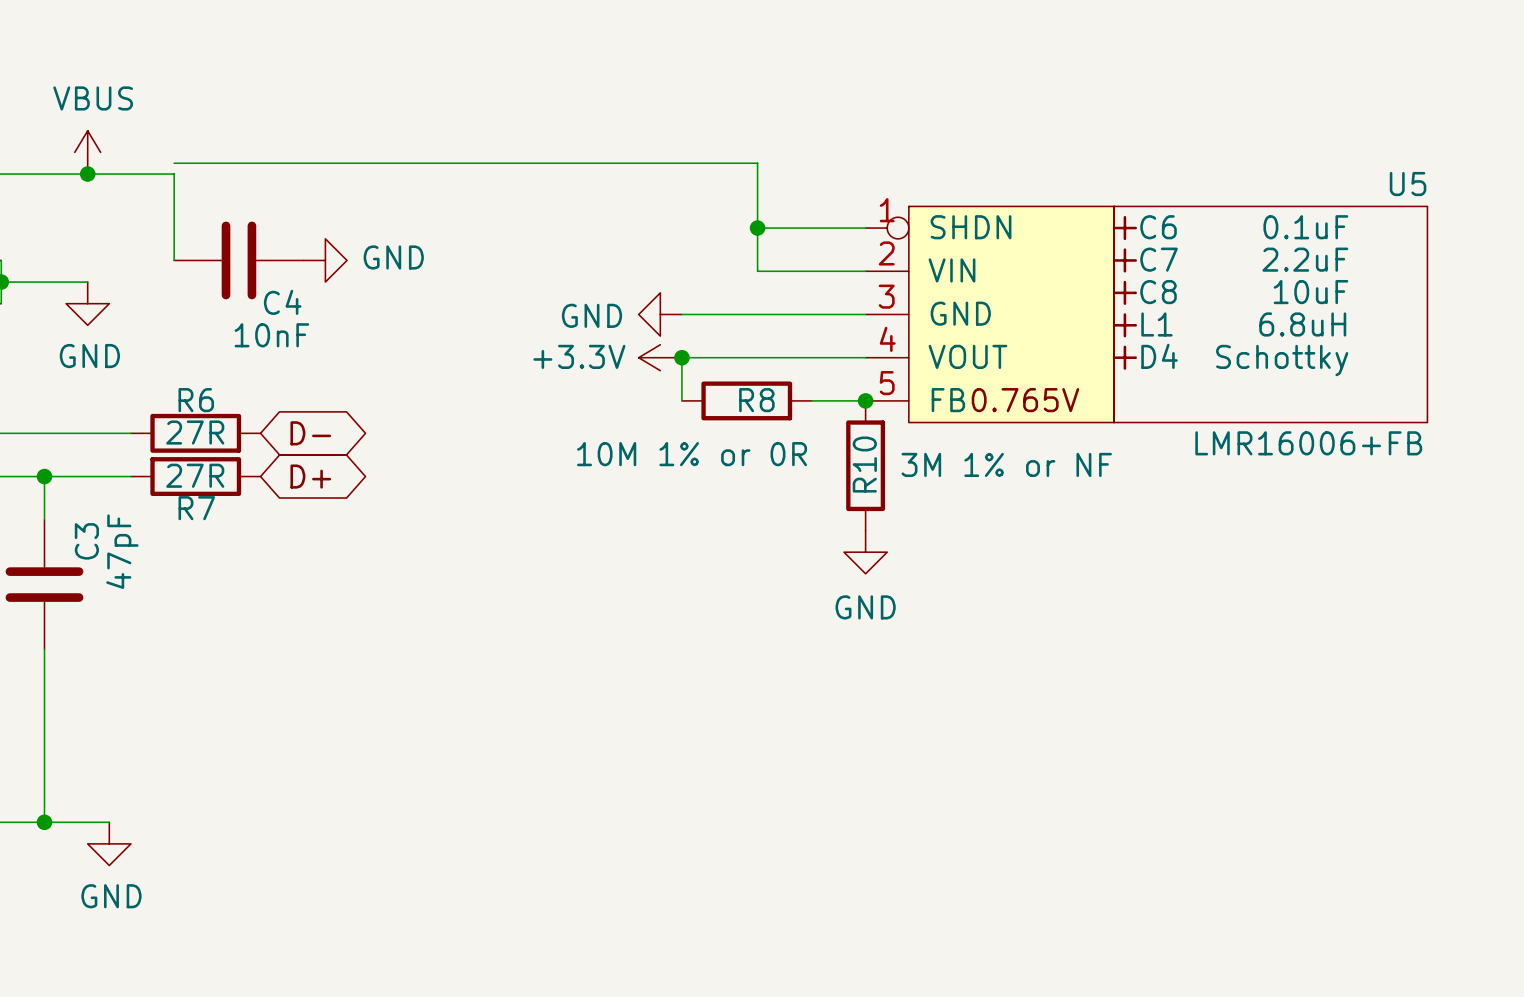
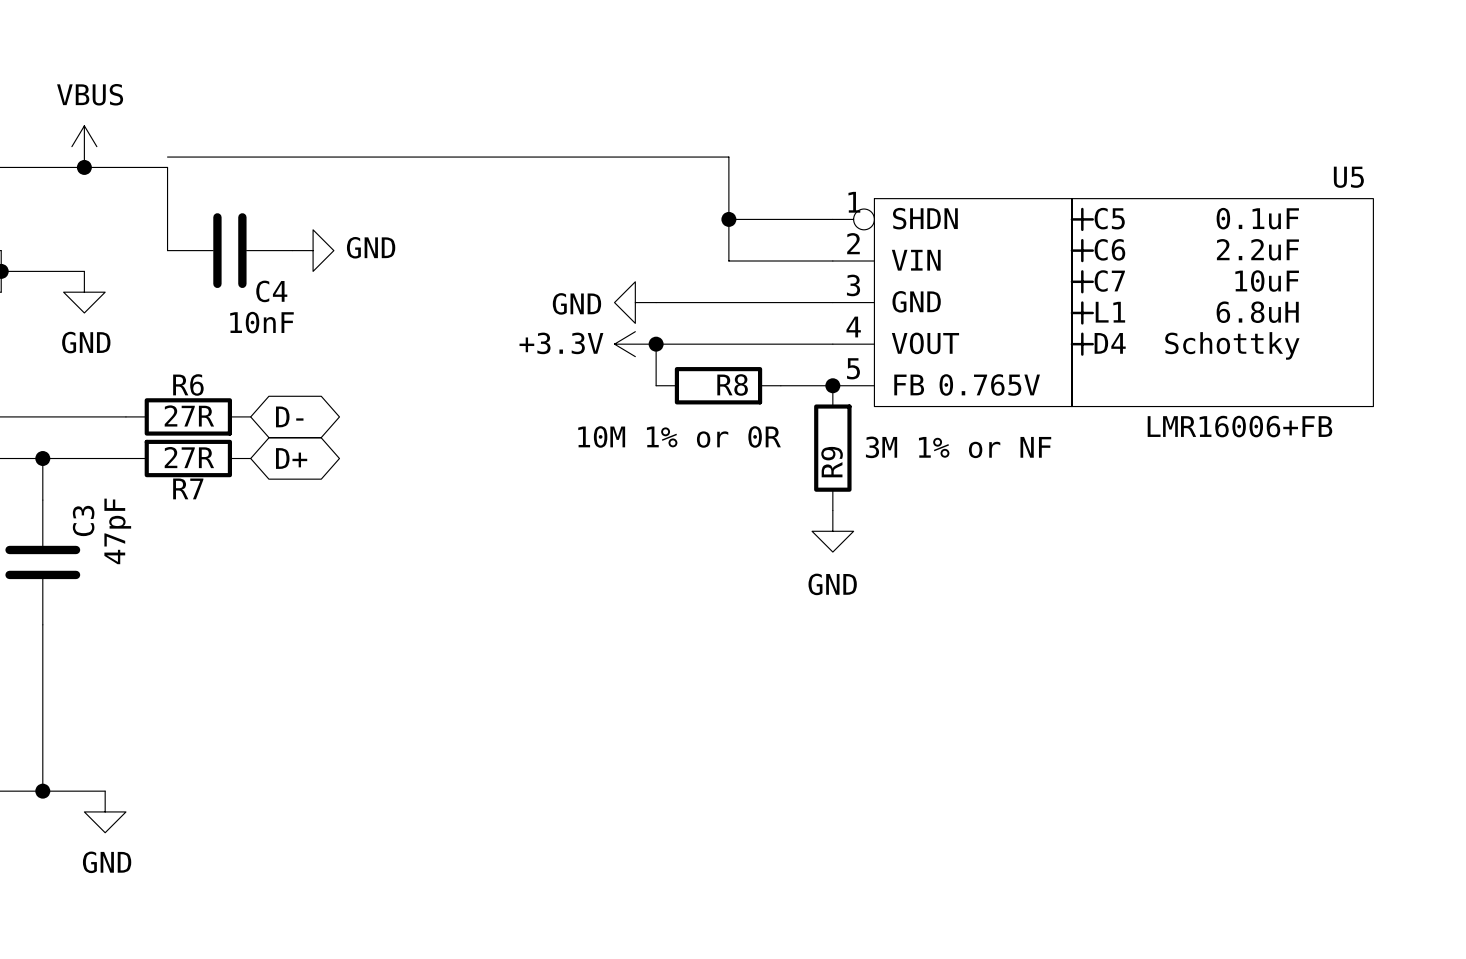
C6 name: C6 (1158, 227) -> C5 (1109, 218)
C7 name: C7 (1159, 259) -> C6 (1109, 249)
C8 name: C8 (1158, 292) -> C7 (1109, 281)
R10 name: R10 (864, 464) -> R9 (832, 462)

